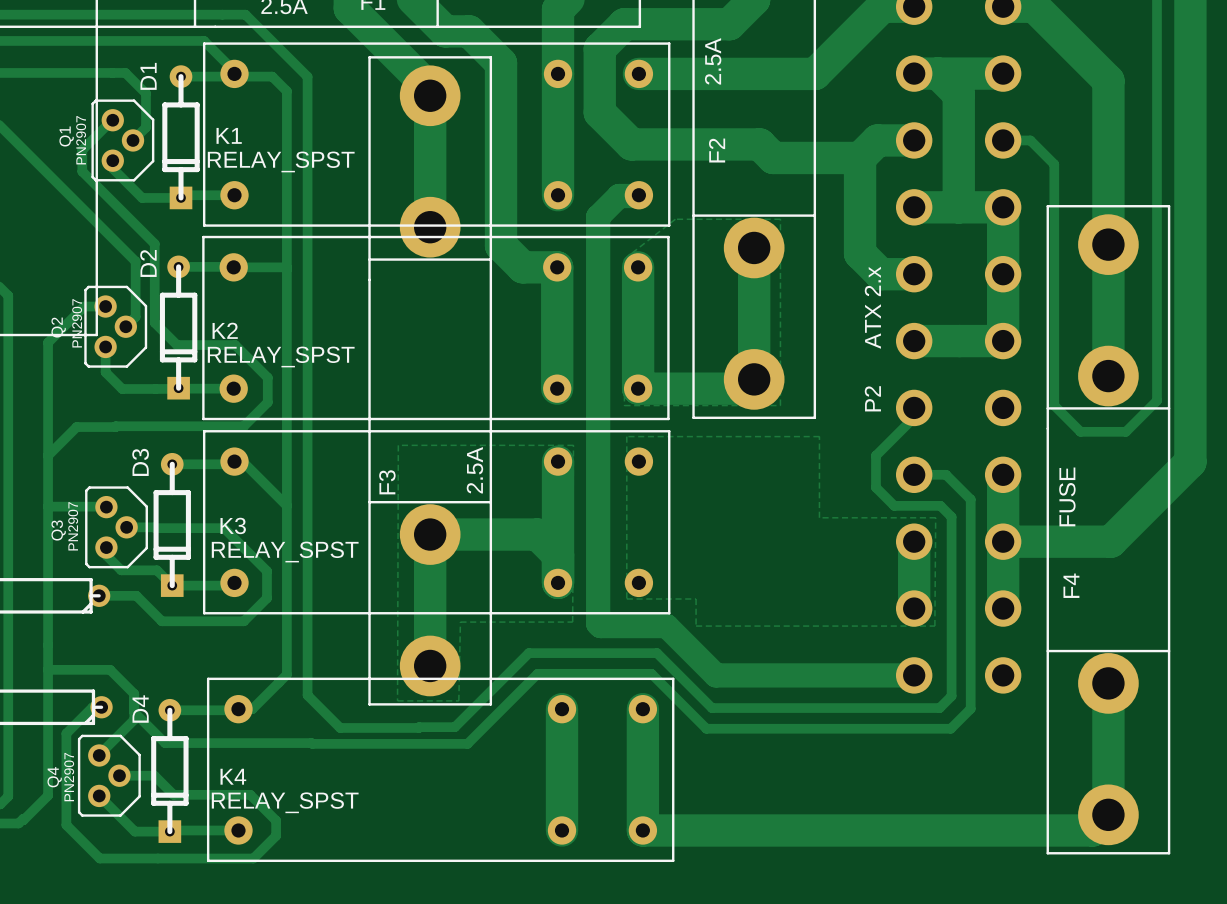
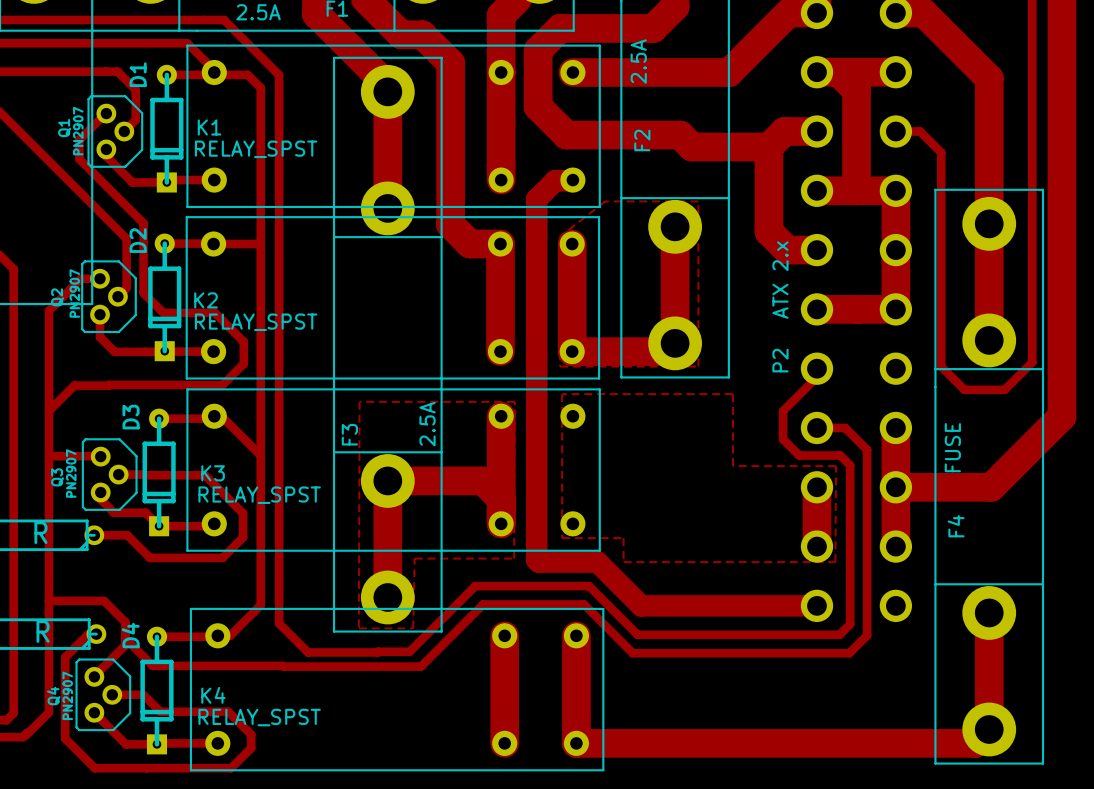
part value: none -> R (40, 532)
part value: none -> R (43, 631)

